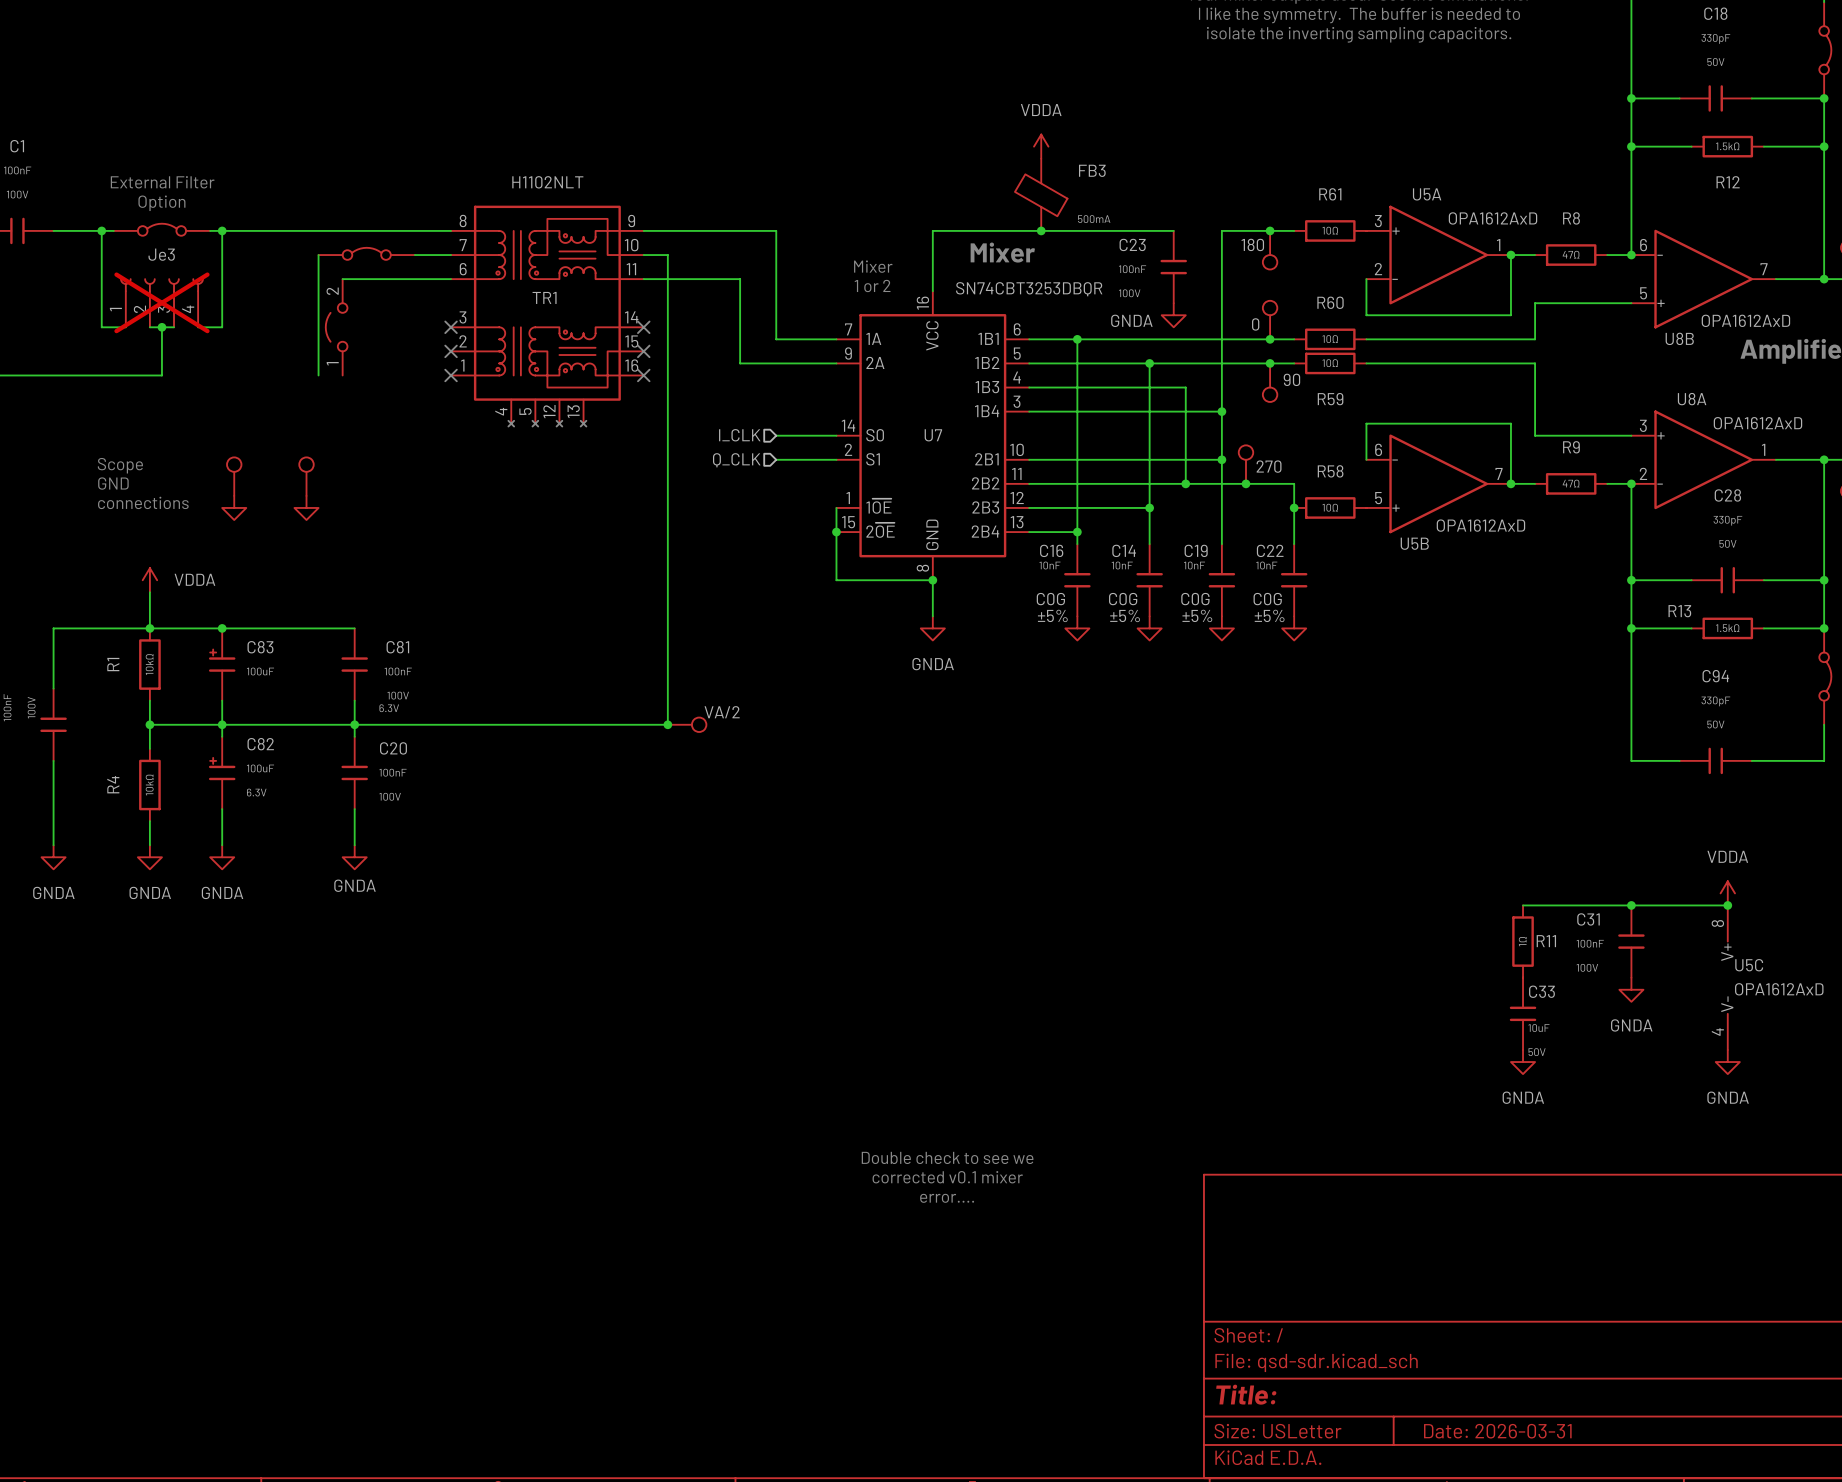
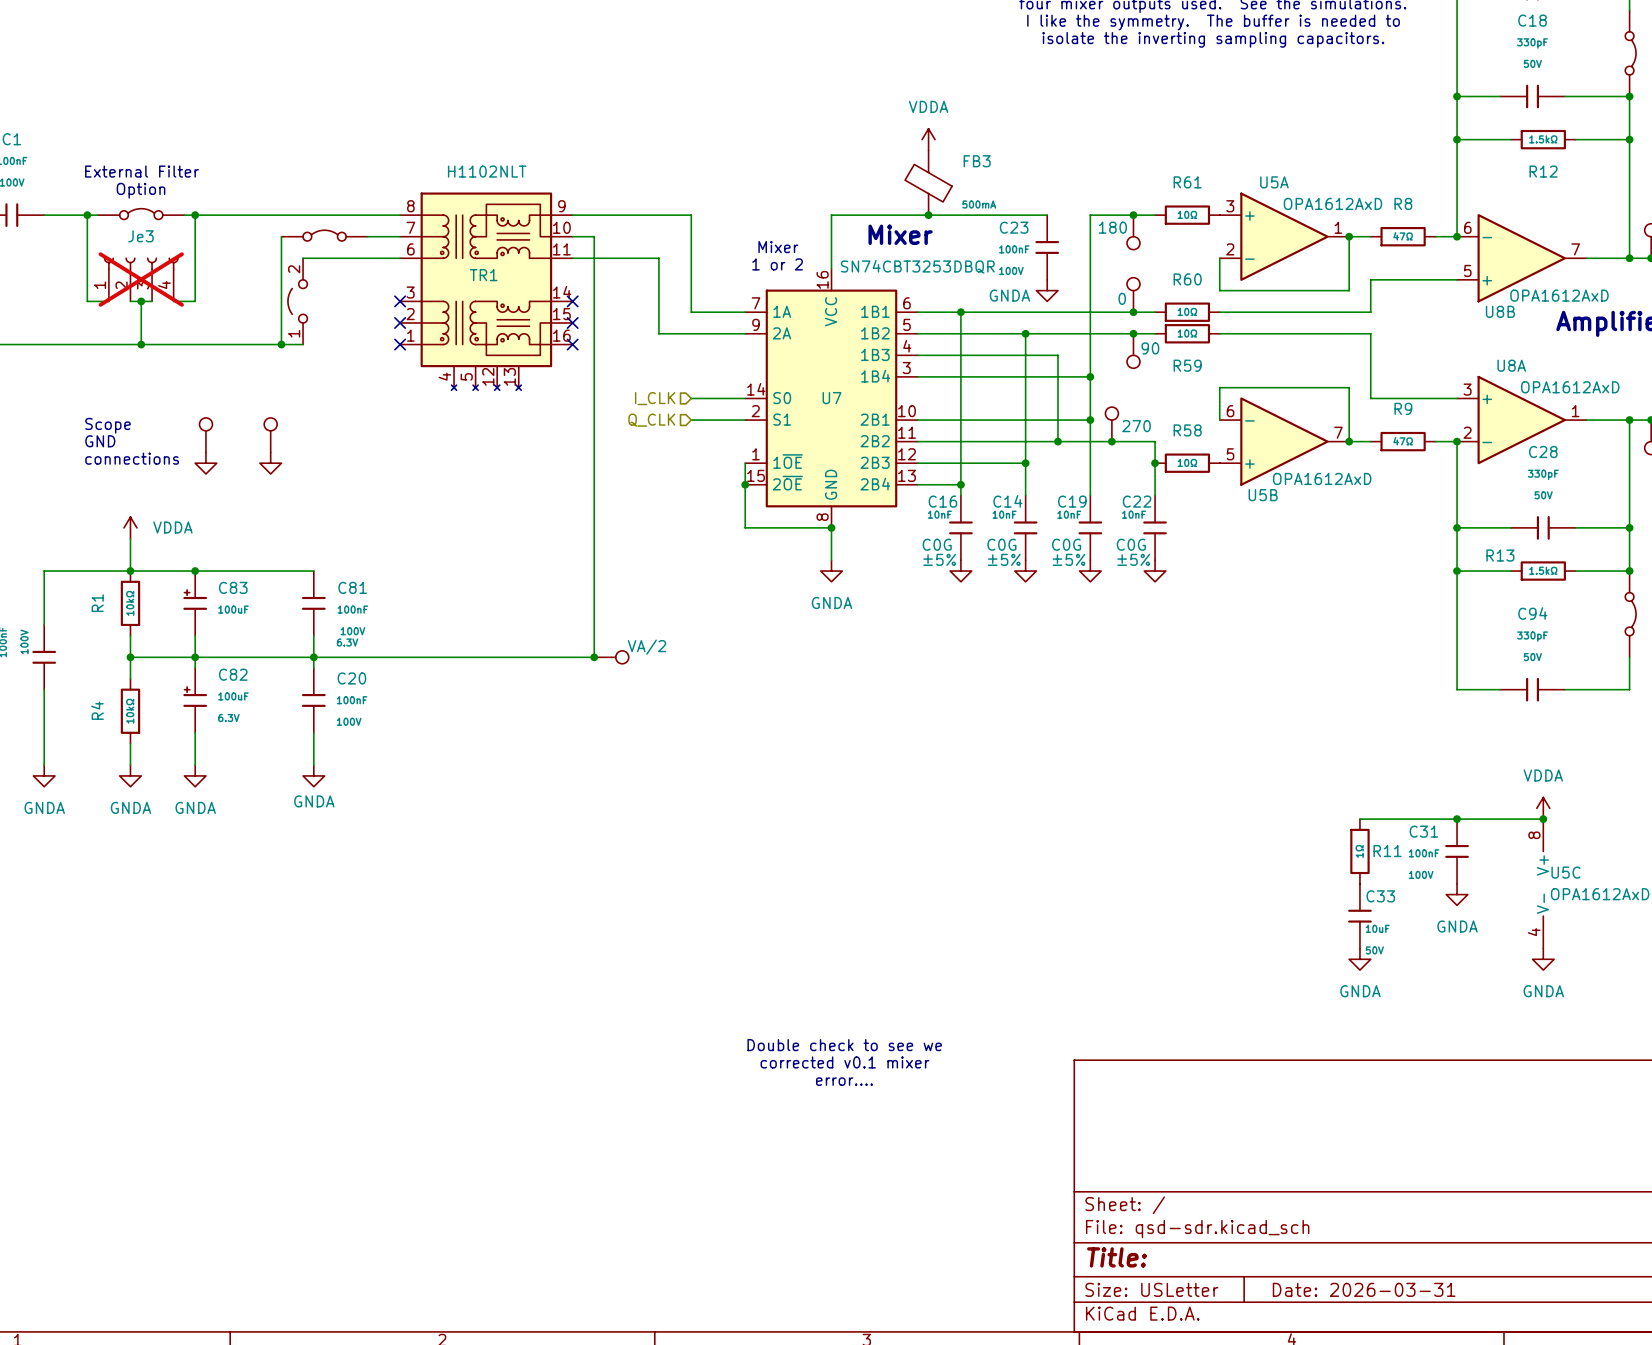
wire: none -> (141, 344) (303, 344)
junction: none -> (141, 344)
junction: none -> (281, 344)

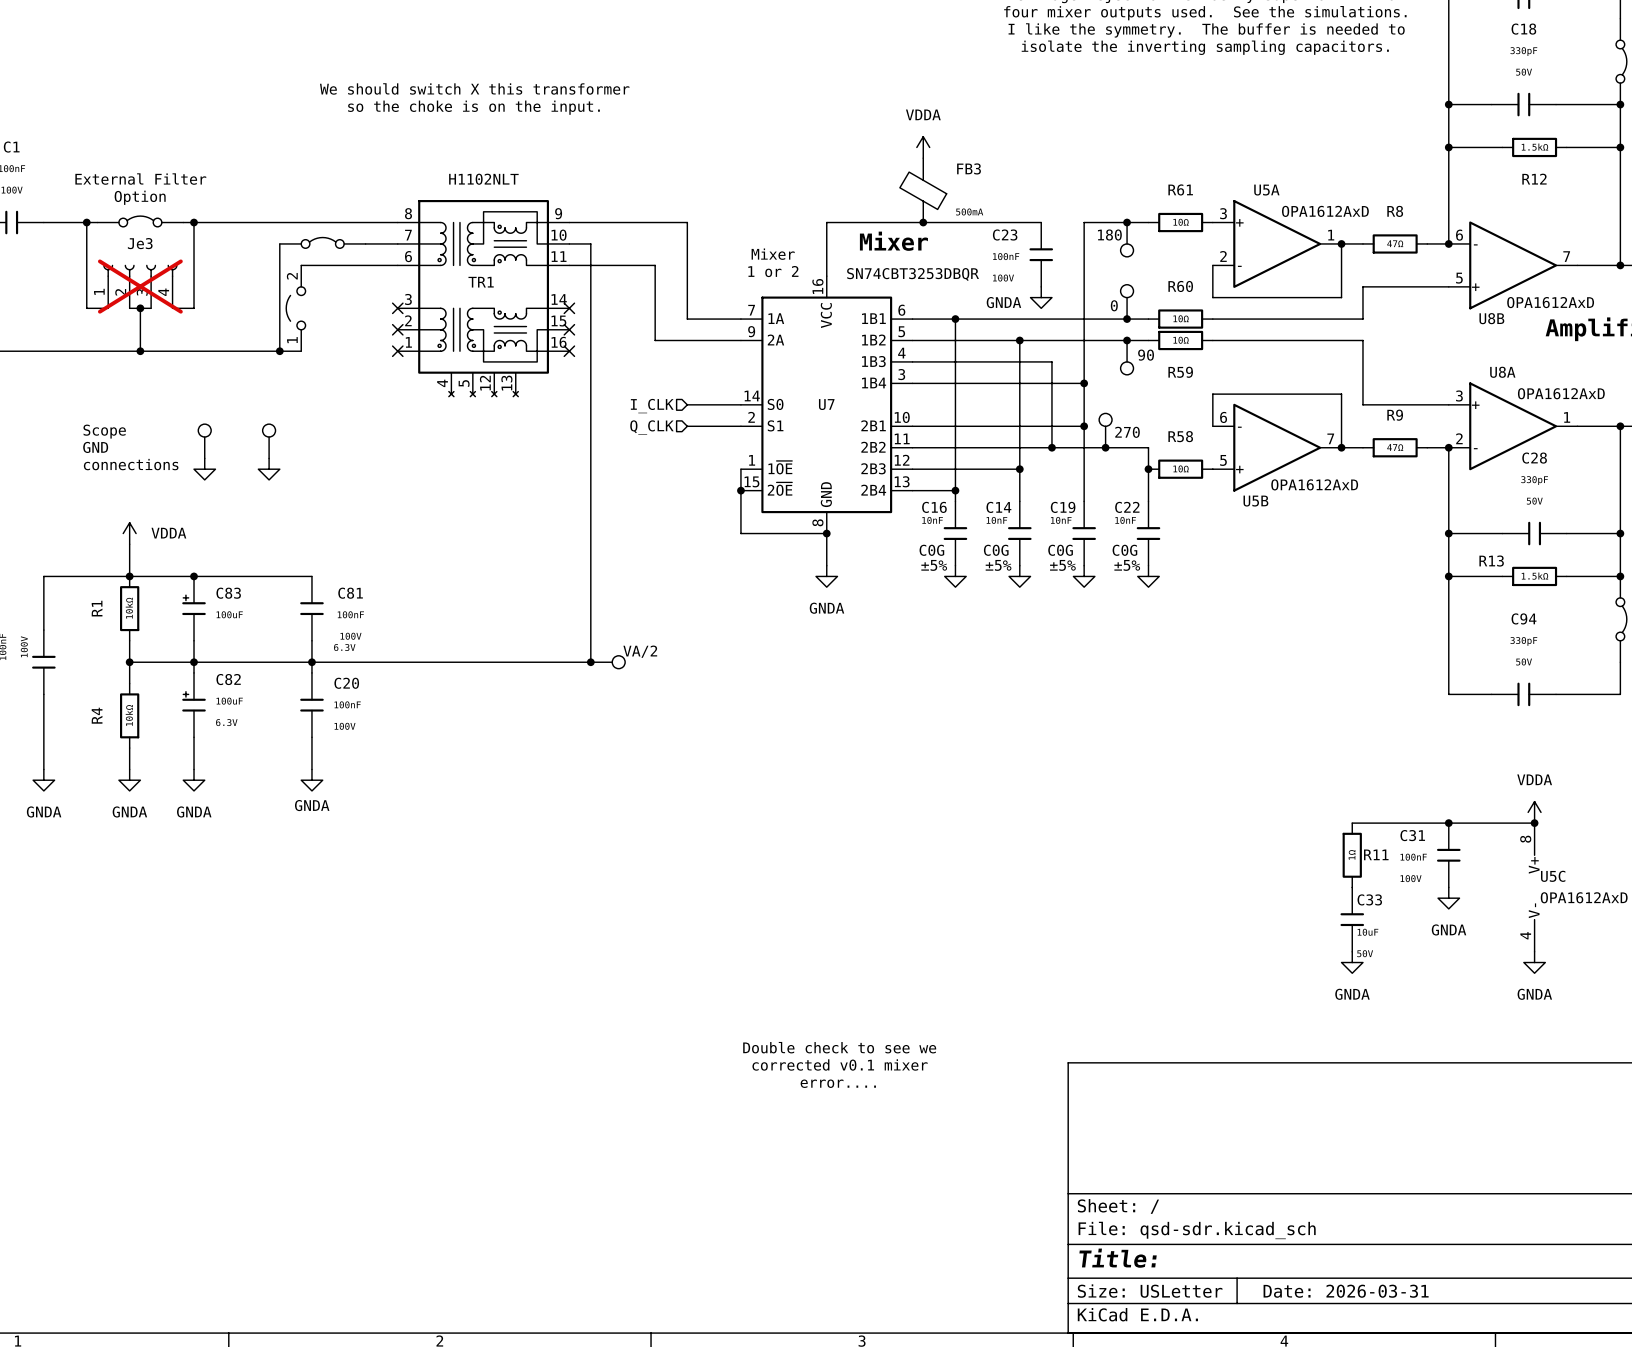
text: none -> We should switch X this transformer (474, 88)
text: none -> so the choke is on the input. (473, 107)

